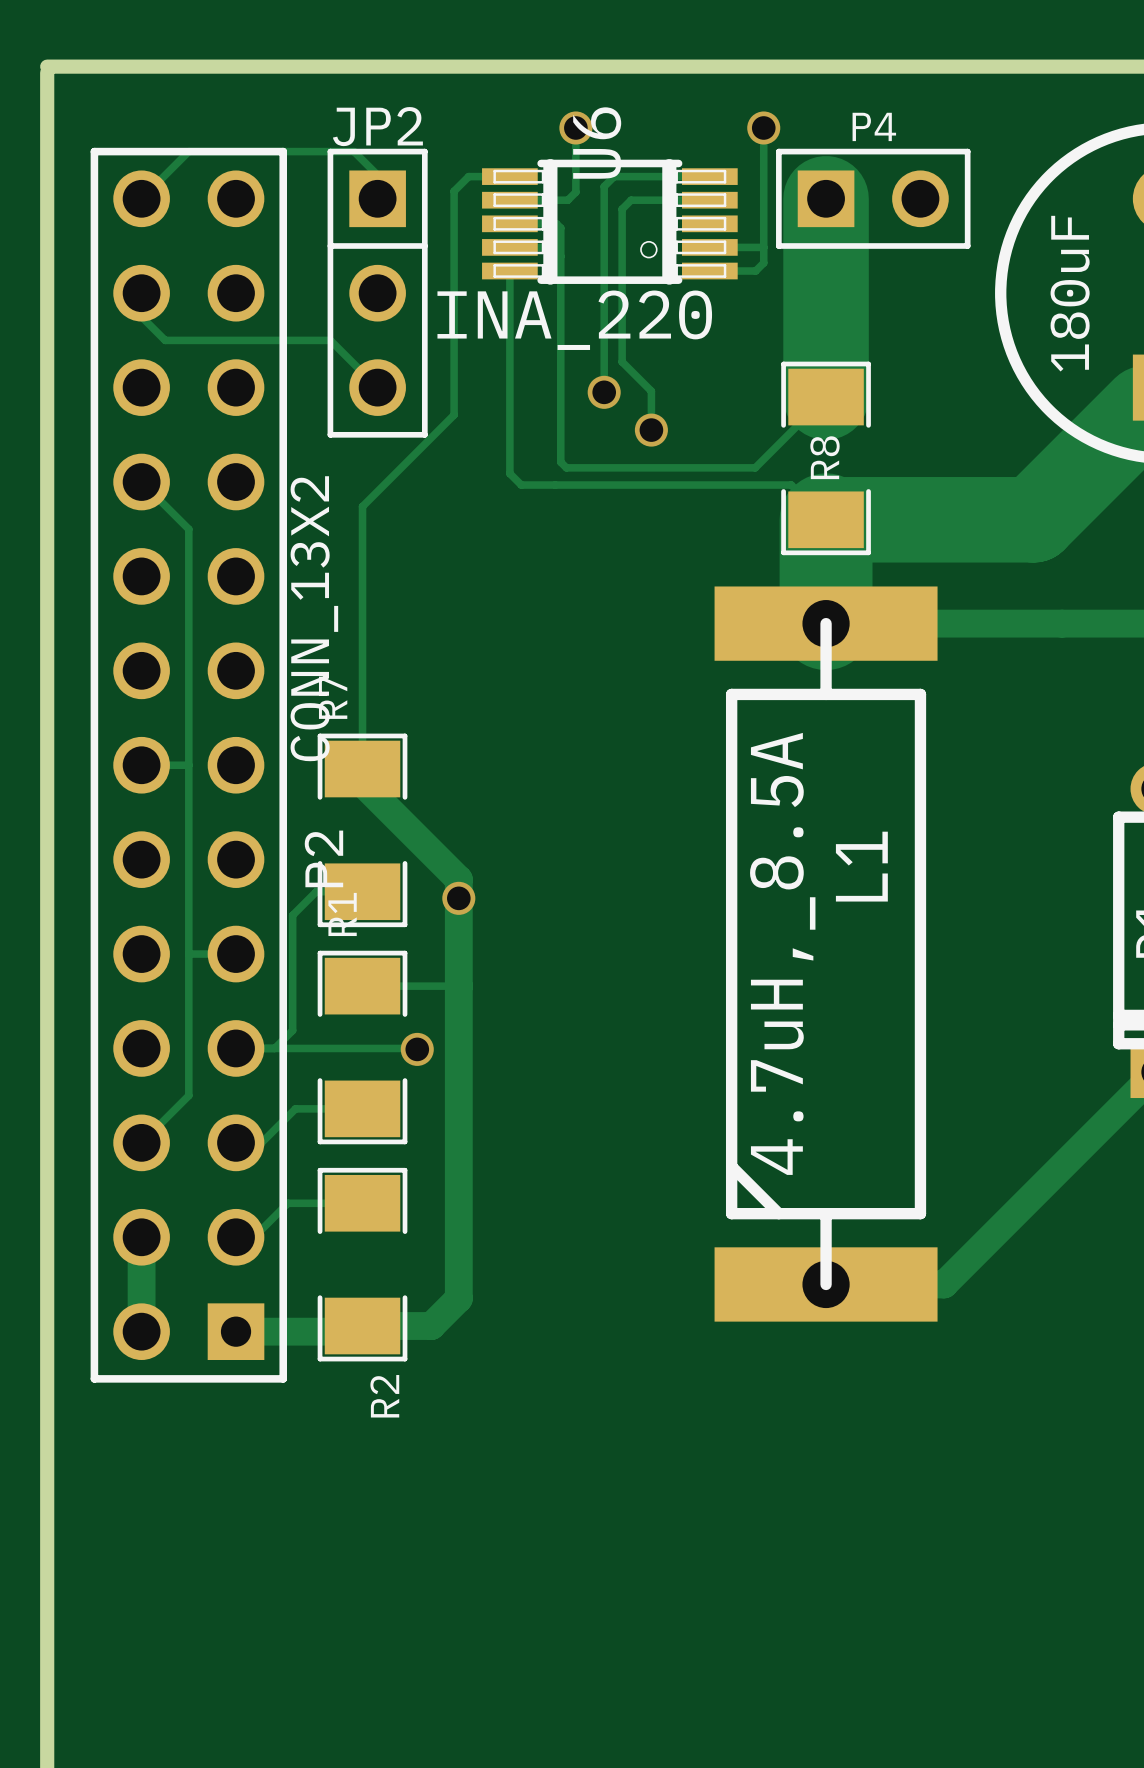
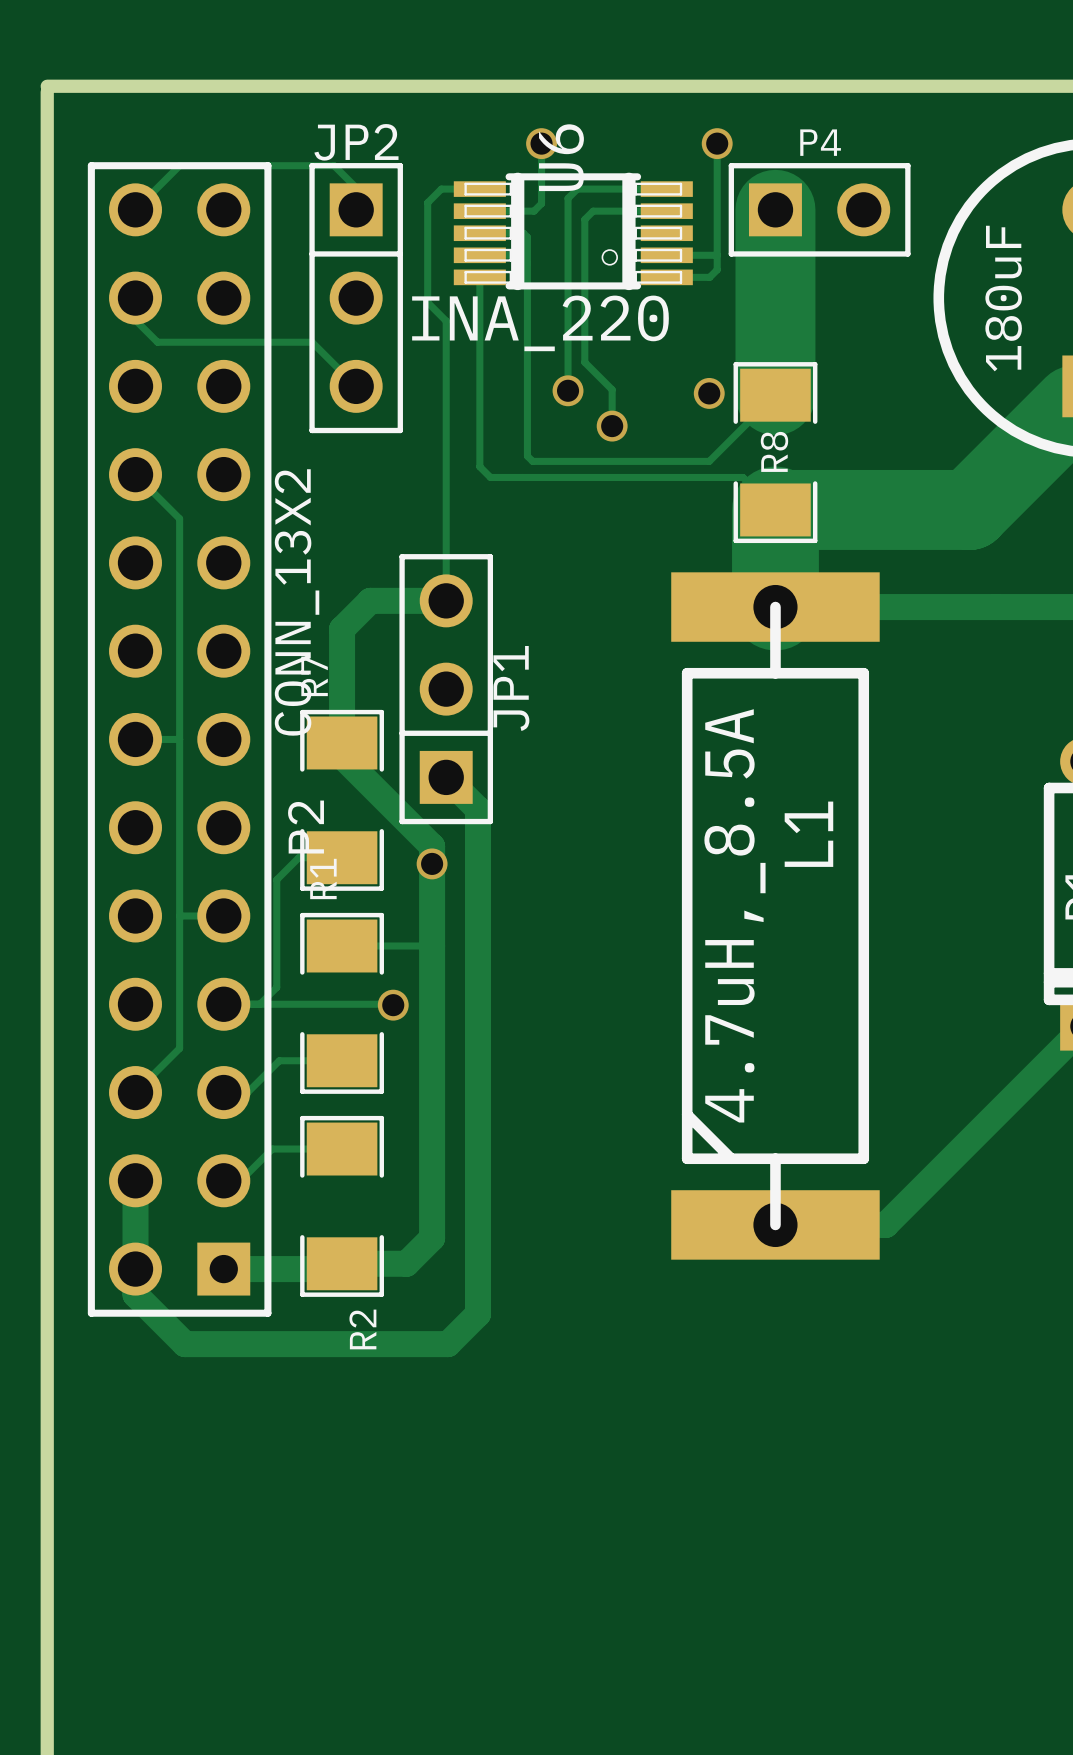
track: (454, 297) (454, 414) (362, 506) (362, 647) -> (427, 302) (446, 321) (446, 600) (370, 600) (342, 629)
via: none -> (709, 393)
track width: thin (362, 647) (362, 769) -> thick (342, 629) (342, 742)
JP1: none -> (446, 689)
track: none -> (446, 777) (477, 809) (477, 1314) (447, 1344) (184, 1344) (135, 1294) (135, 1269)

